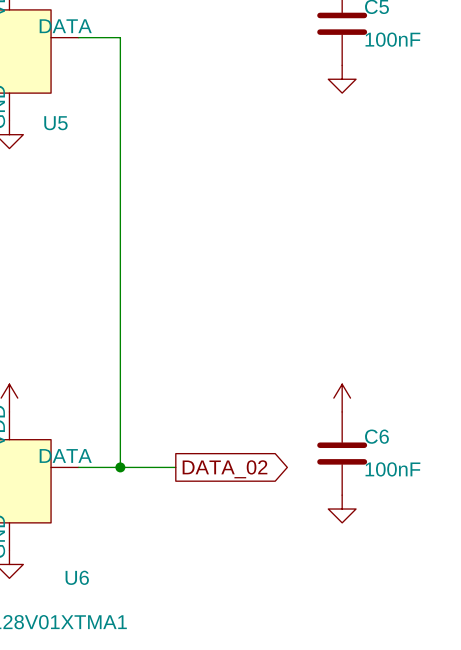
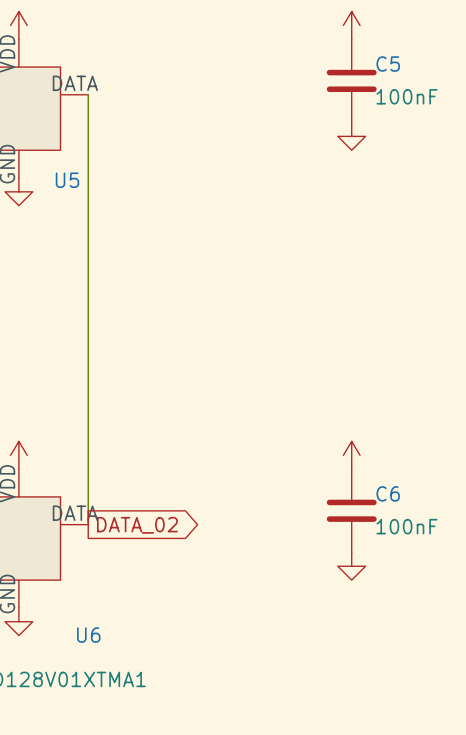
wire: (78, 37) (120, 37) (120, 467) -> (88, 94) (88, 524)
wire: (78, 467) (175, 467) -> none
junction: (120, 467) -> none
global label position: DATA_02 (225, 469) -> DATA_02 (137, 525)

